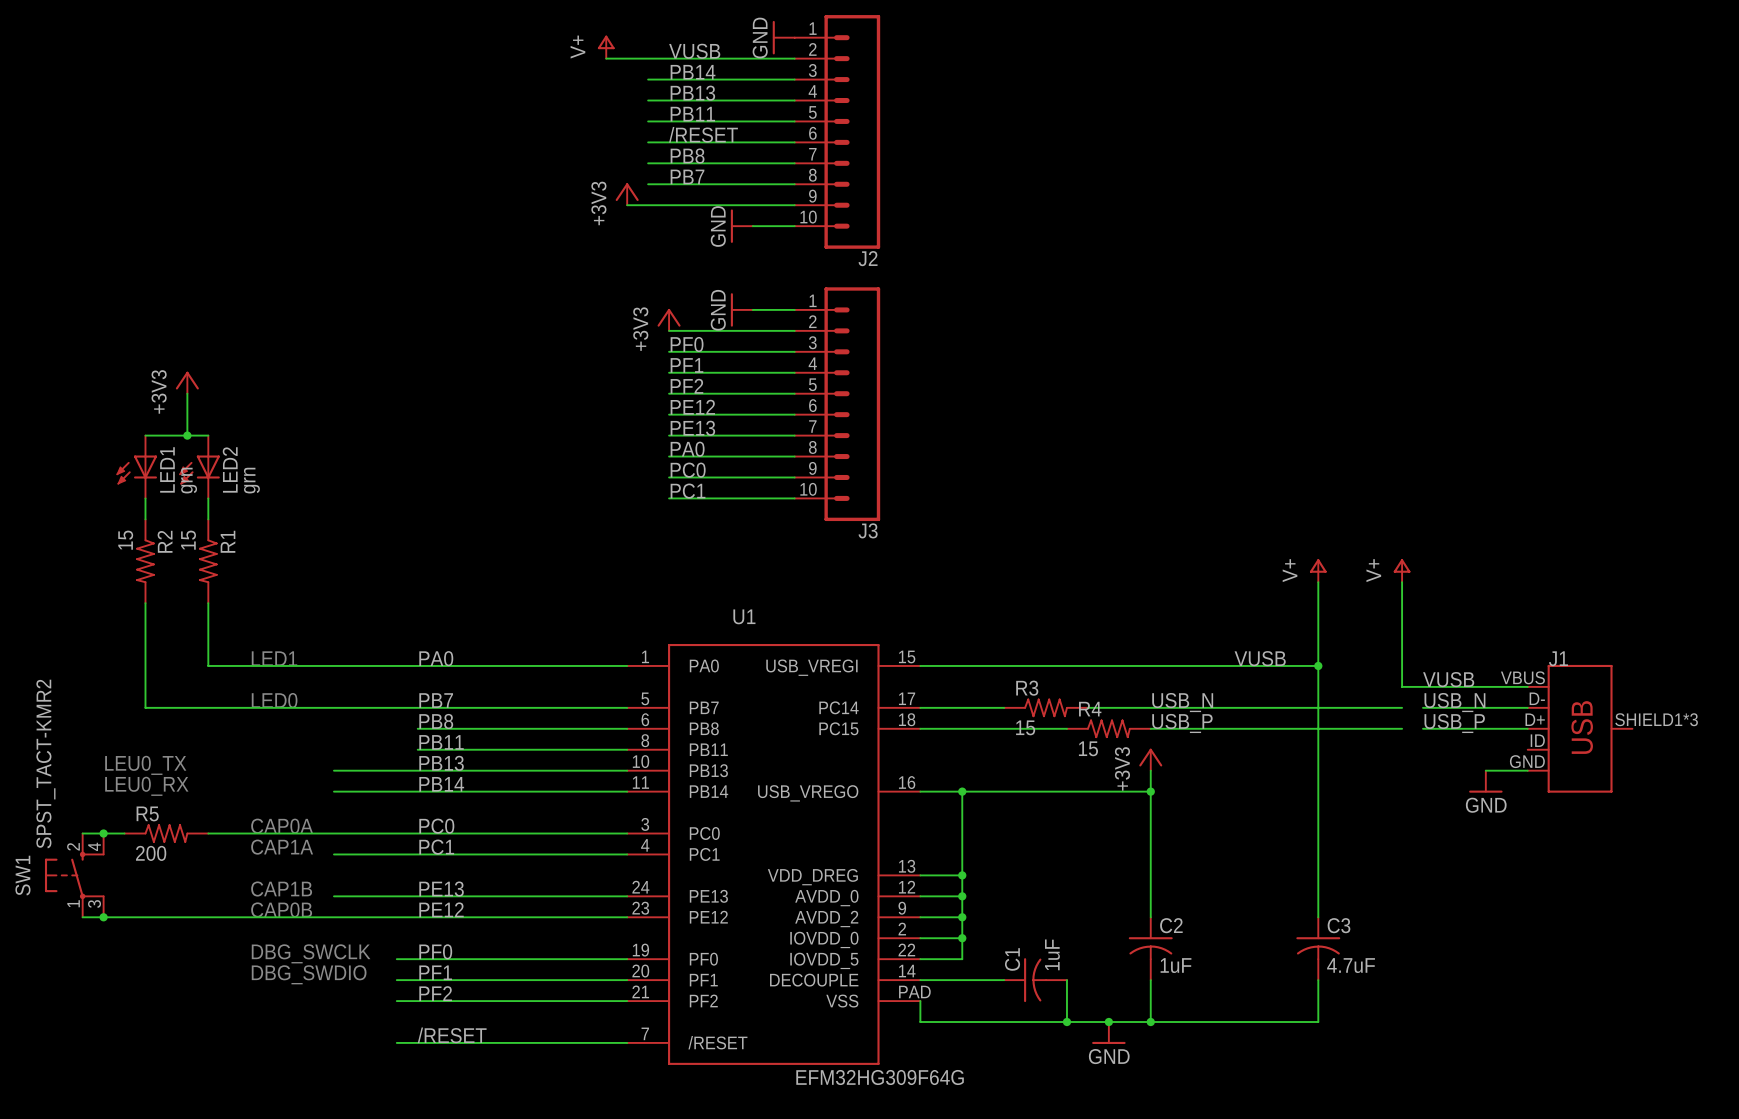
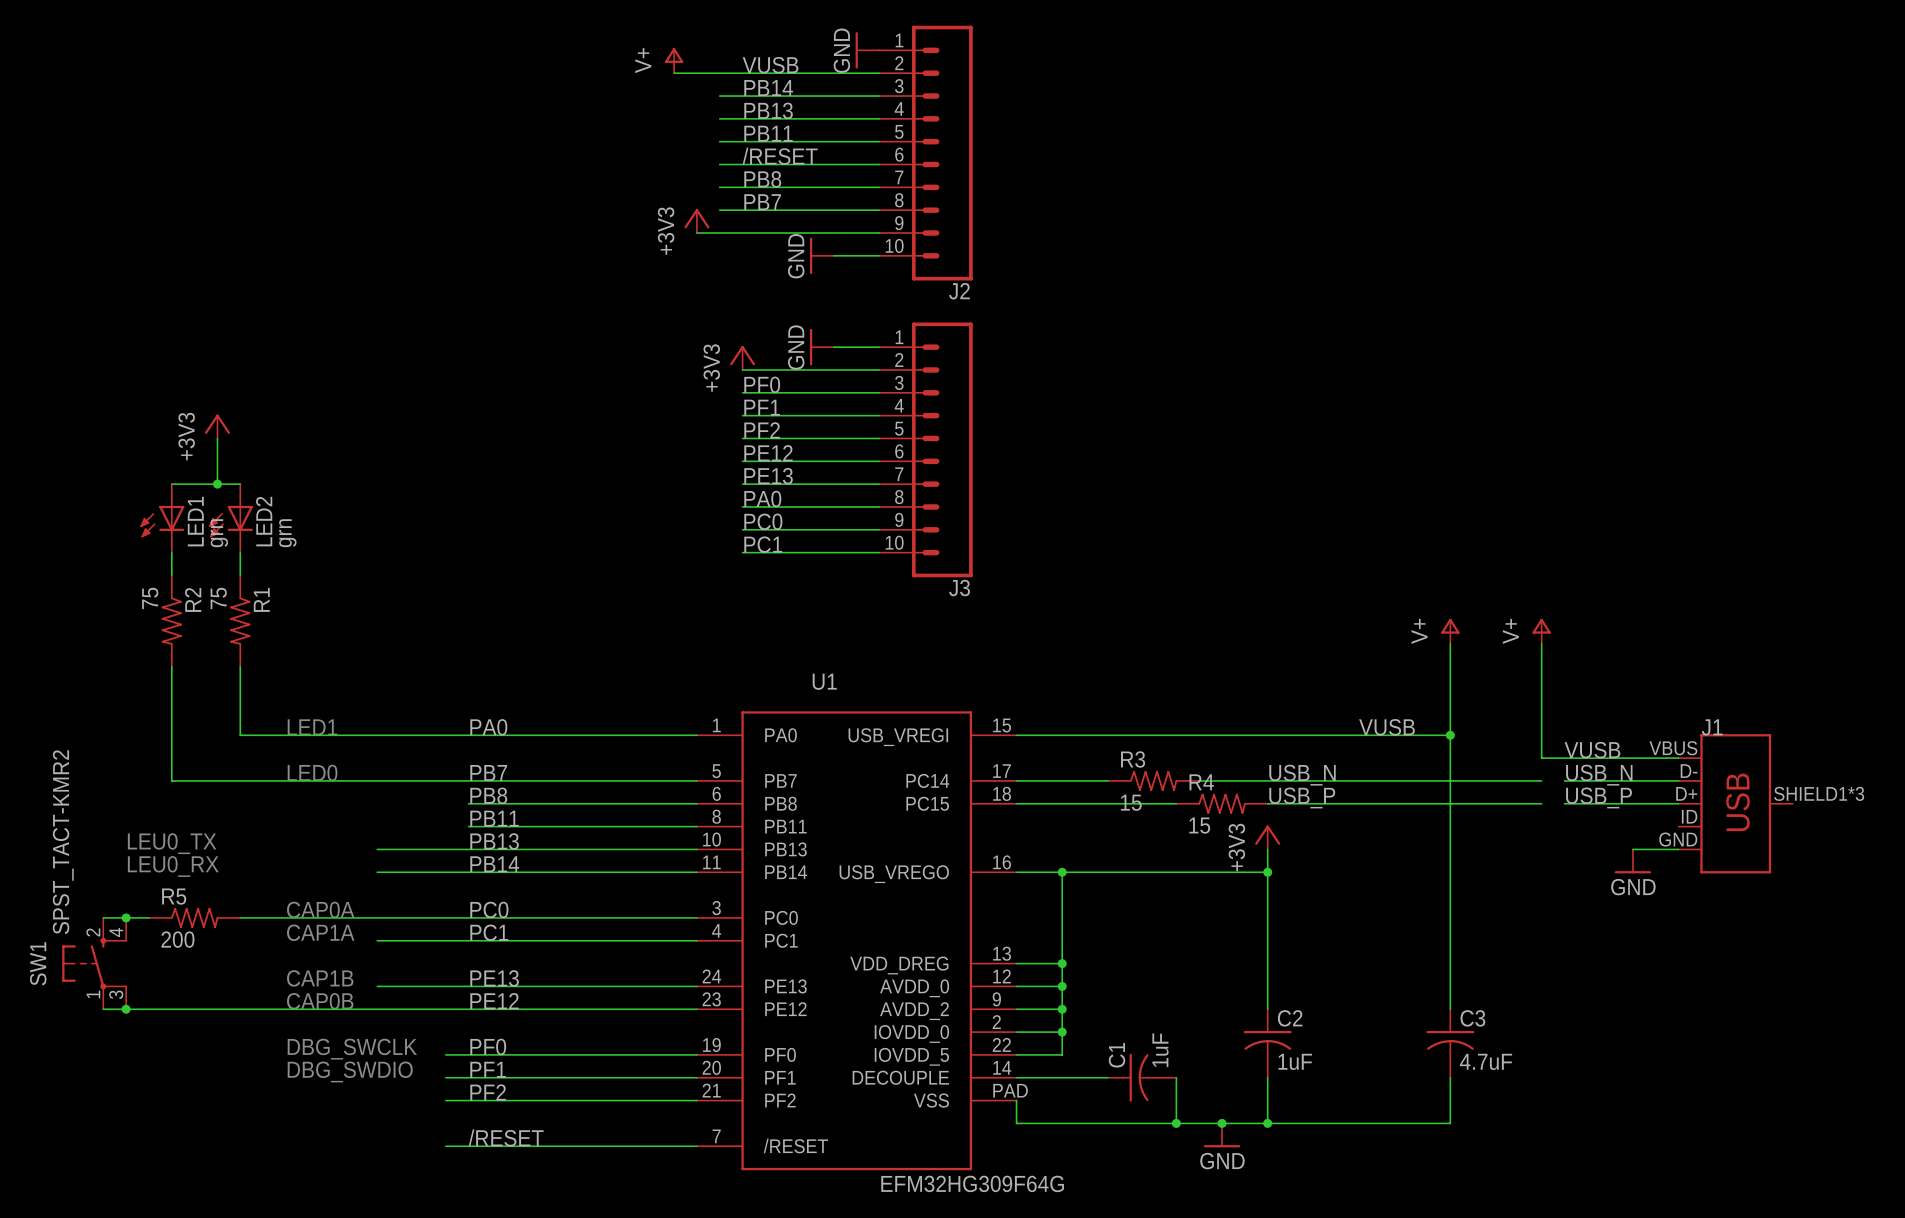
R2 value: 15 (125, 540) -> 75 (150, 598)
R1 value: 15 (188, 540) -> 75 (218, 598)

